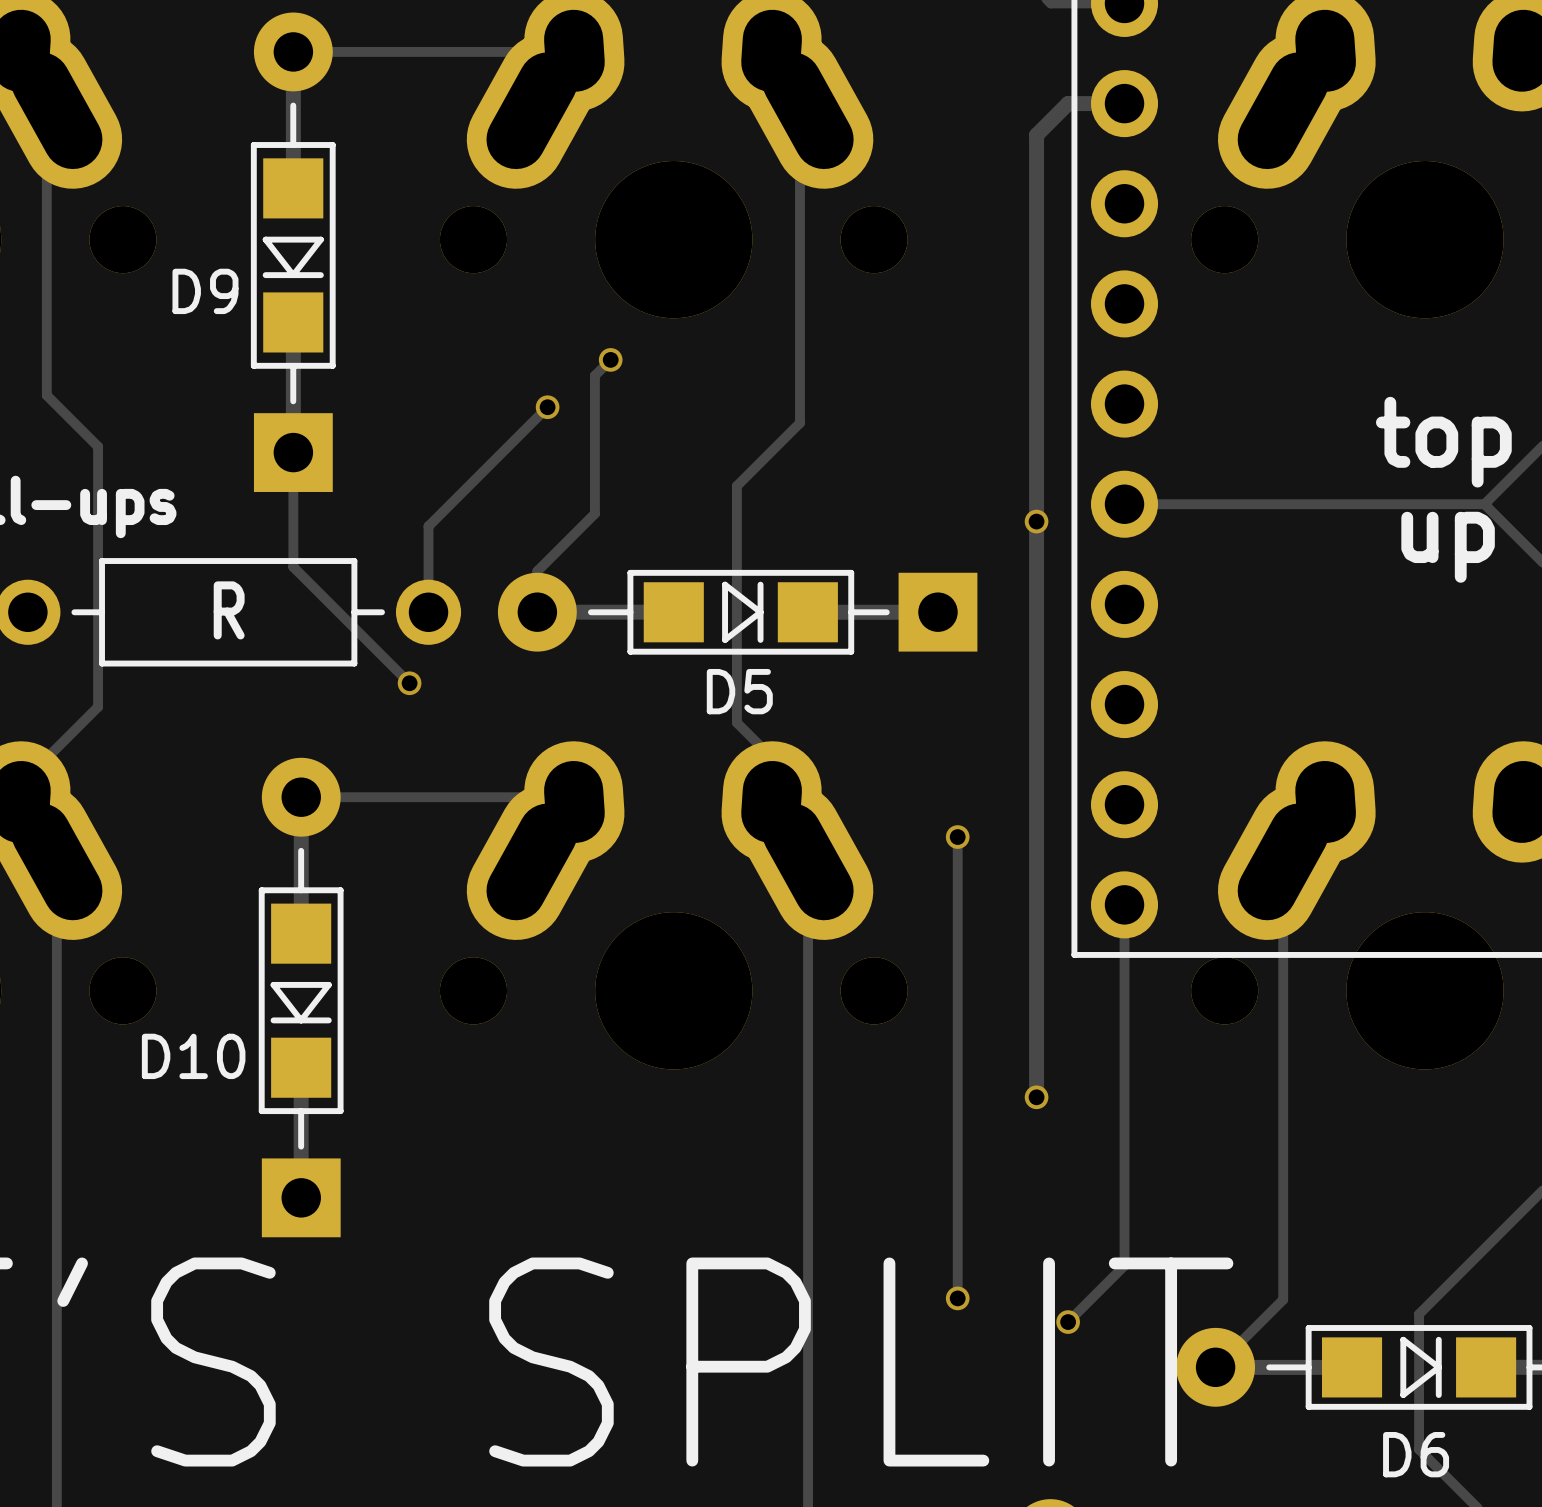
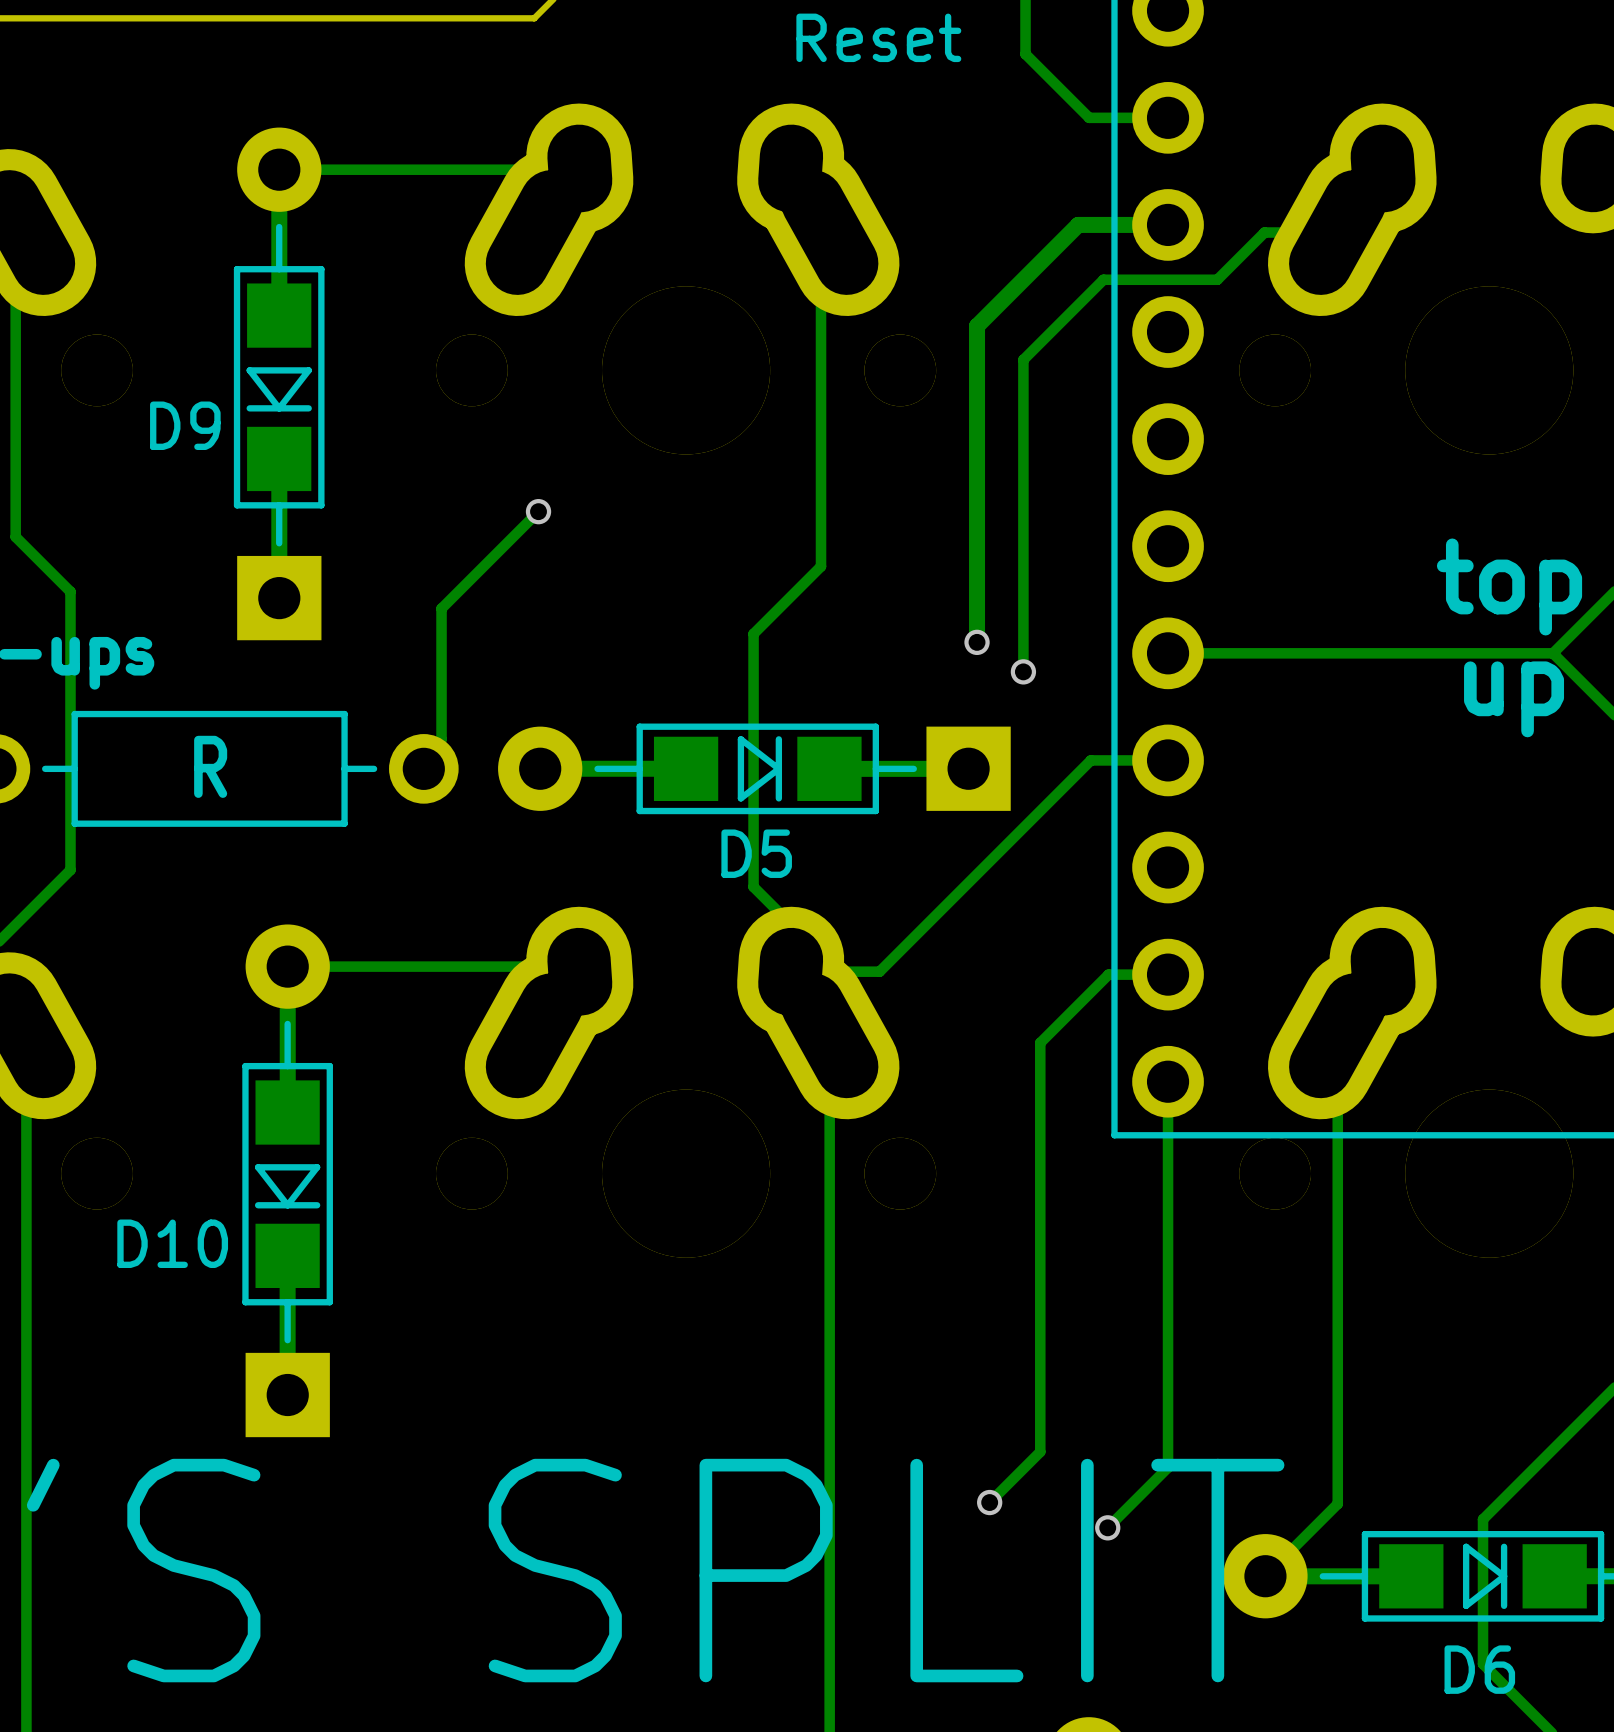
track: (1068, 103) (1036, 135) (1036, 1097) -> (1107, 224) (1078, 224) (977, 326) (977, 642)
track: none -> (1337, 232) (1264, 232) (1217, 279) (1103, 279) (1023, 359) (1023, 671)
track: (610, 359) (594, 375) (594, 513) (537, 571) (537, 612) -> none
via: (610, 359) -> none
track: (547, 407) (428, 526) (428, 601) -> (538, 511) (441, 608) (441, 739) (423, 757)
via position: (547, 407) -> (538, 511)
track: (293, 452) (293, 567) (409, 683) -> none
via: none -> (977, 642)
via: none -> (1023, 671)
via: (1036, 521) -> none
track: none -> (1168, 760) (1090, 760) (879, 971) (790, 971)
via: (409, 683) -> none
track: (957, 837) (957, 1298) -> (1168, 974) (1108, 974) (1040, 1042) (1040, 1451) (989, 1502)
via: (957, 837) -> none
via: (1036, 1097) -> none

